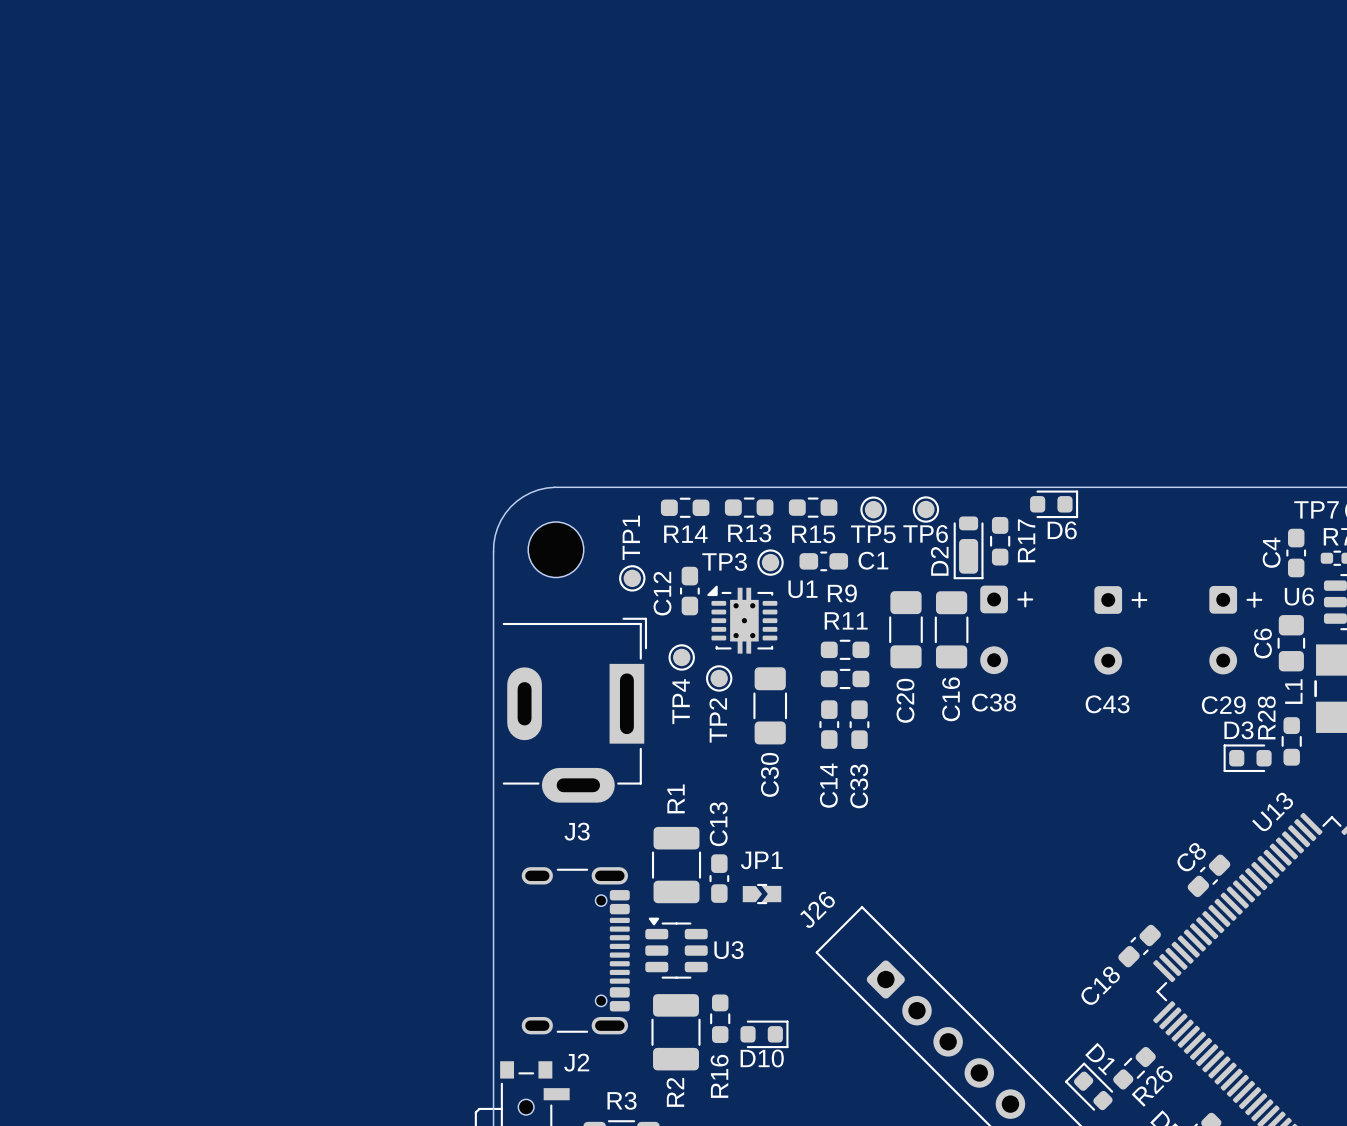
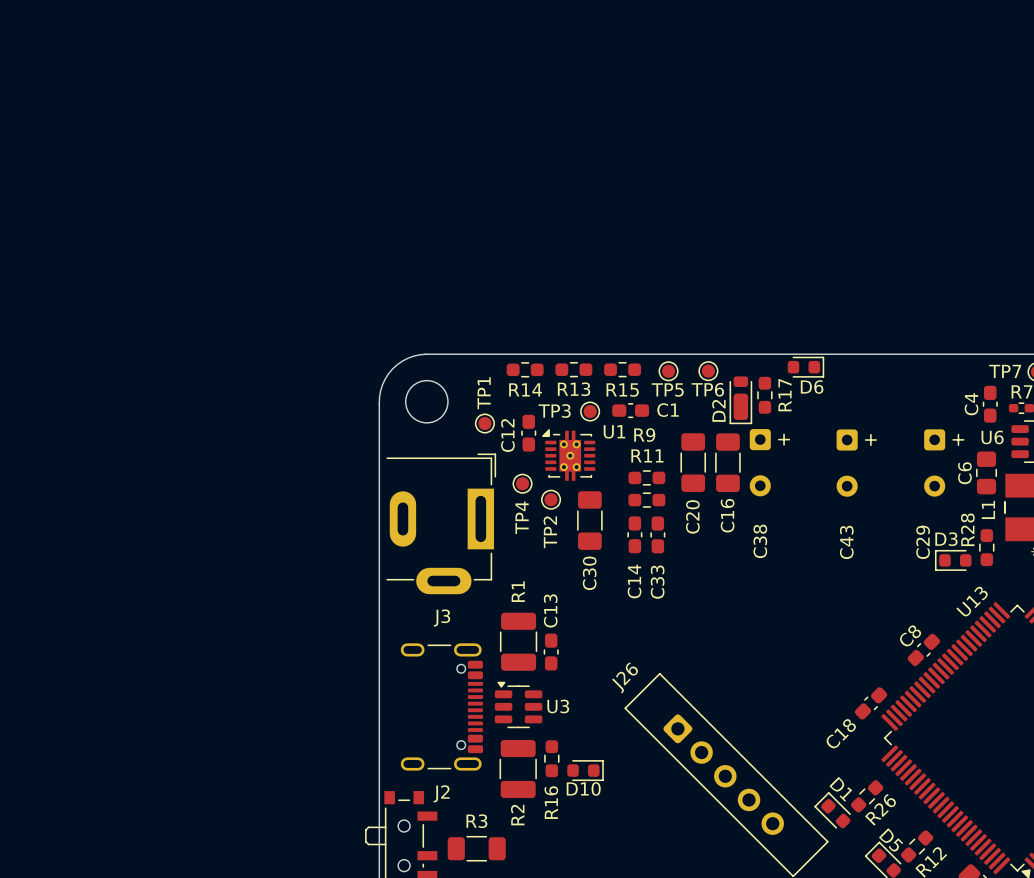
C38 name rotation: 0° (994, 702) -> 90° counterclockwise (760, 541)
C43 name rotation: 0° (1107, 704) -> 90° counterclockwise (846, 542)
C29 name rotation: 0° (1223, 705) -> 90° counterclockwise (923, 542)
JP1: (762, 894) -> none

